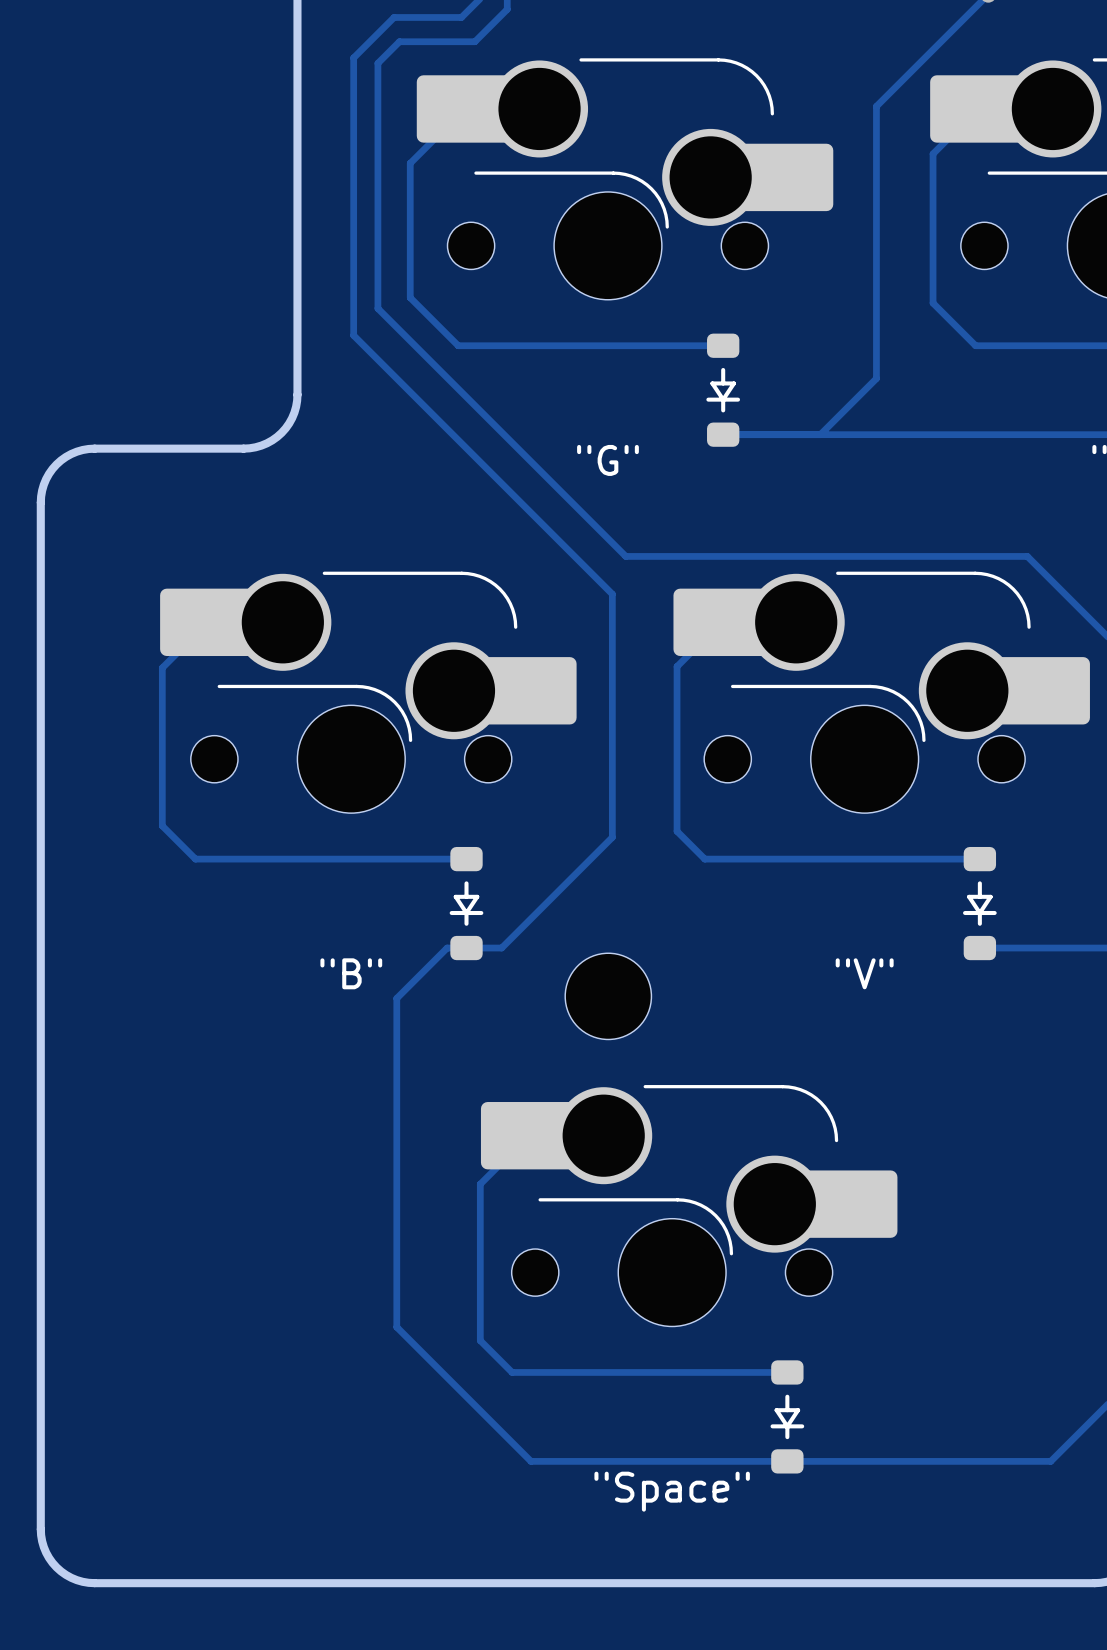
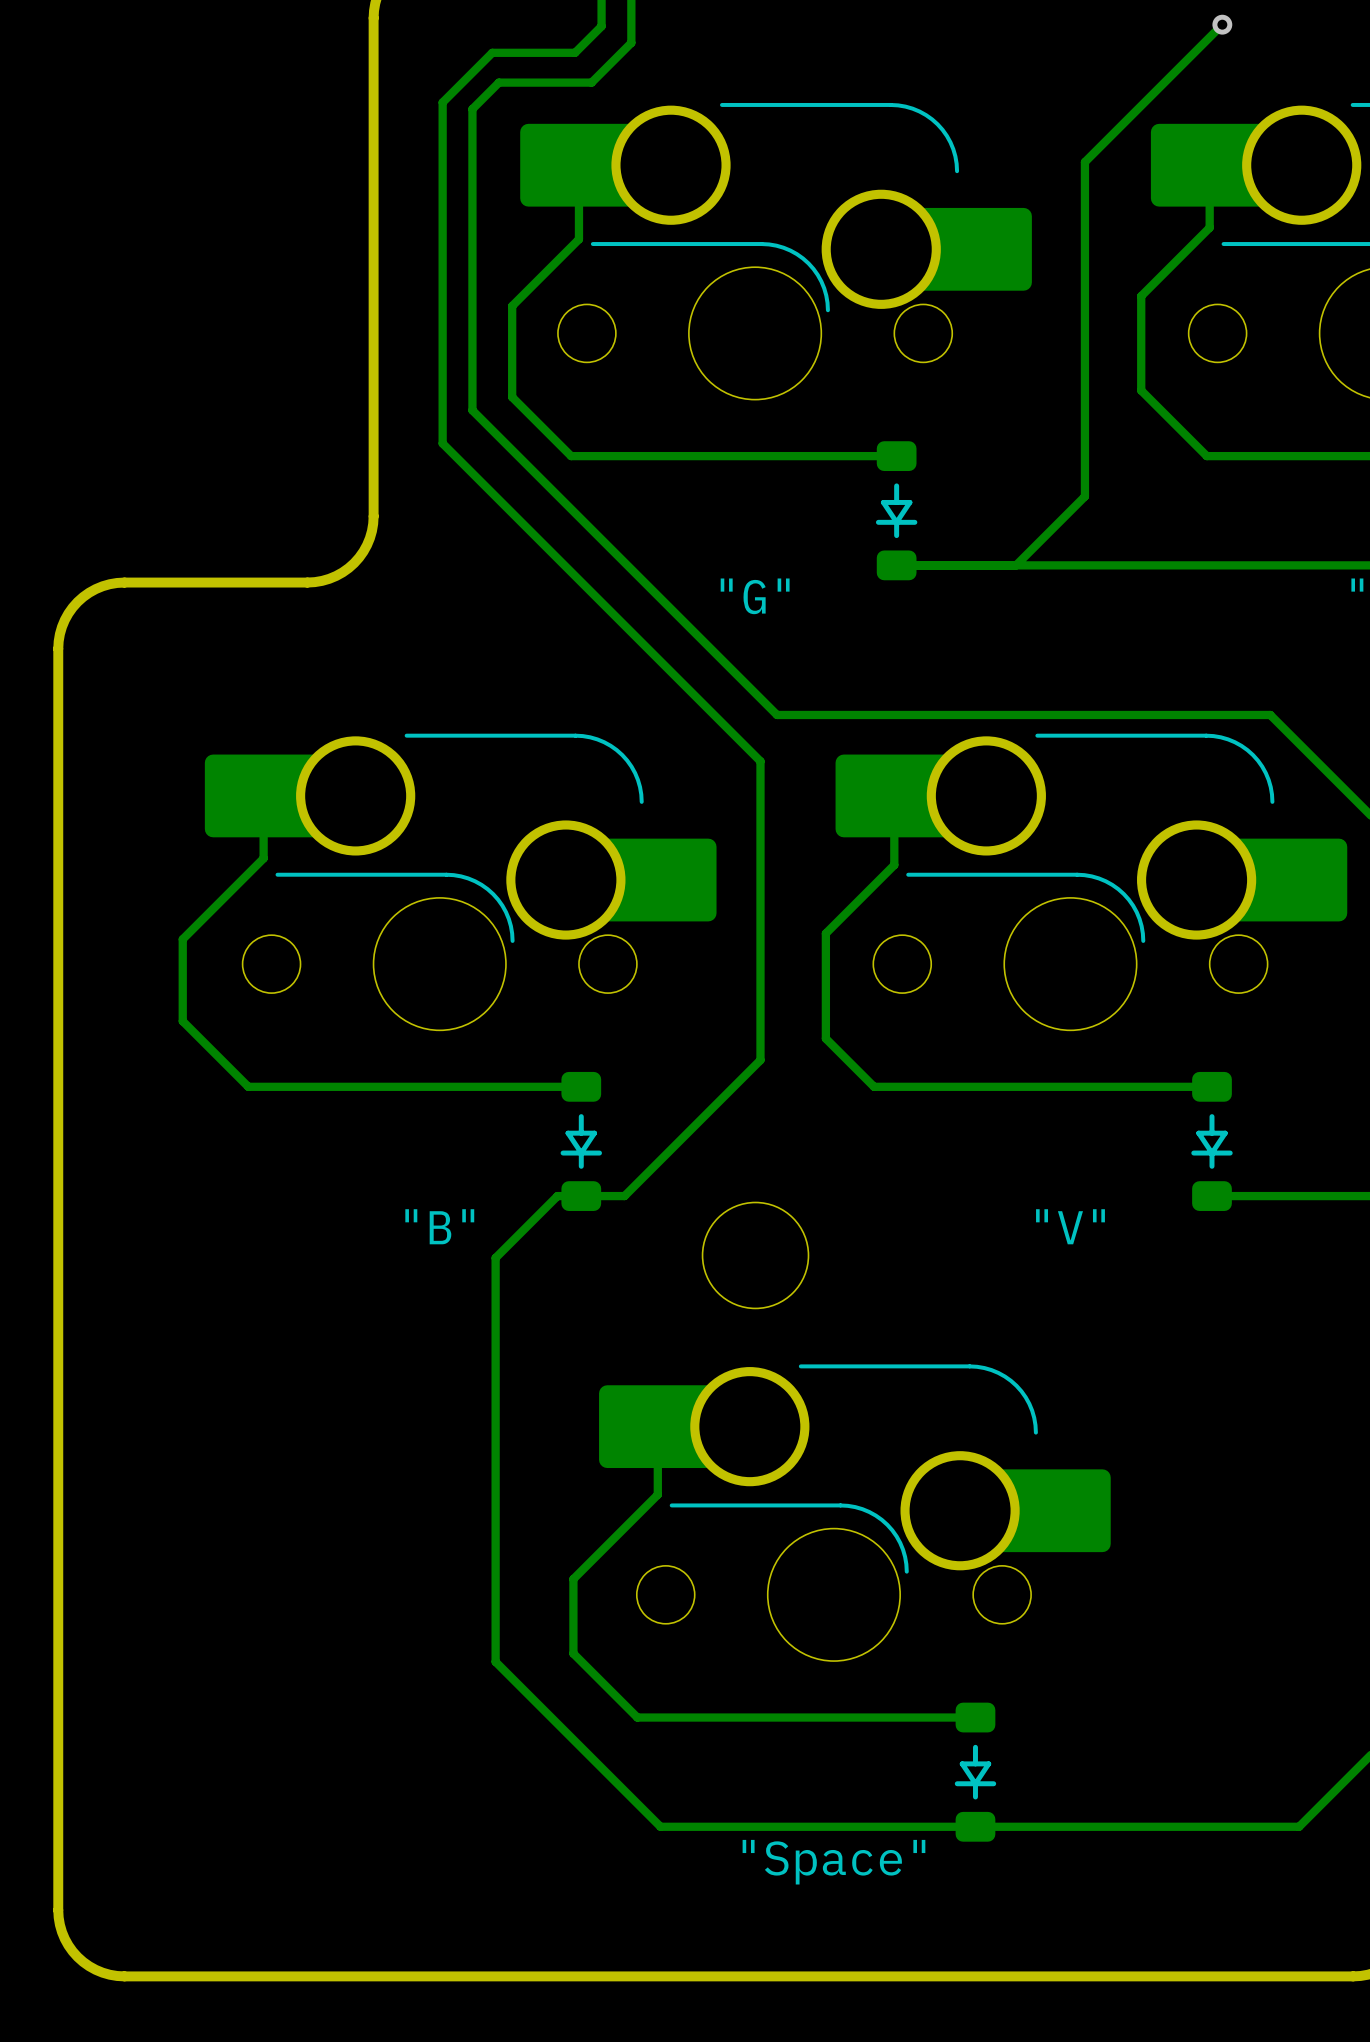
track: (464, 108) (410, 163) (410, 223) -> (578, 165) (578, 239) (512, 306)
track: (977, 108) (933, 153) (933, 303) -> (1209, 165) (1209, 227) (1141, 296) (1141, 390) (1154, 403)
track: (207, 622) (162, 667) (162, 825) -> (263, 795) (263, 858) (182, 939) (182, 1021) (207, 1046)
track: (721, 622) (677, 666) (677, 831) -> (894, 795) (894, 865) (825, 933) (825, 1038) (839, 1052)
track: (528, 1135) (480, 1184) (480, 1340) -> (657, 1426) (657, 1494) (573, 1579) (573, 1653) (598, 1678)

